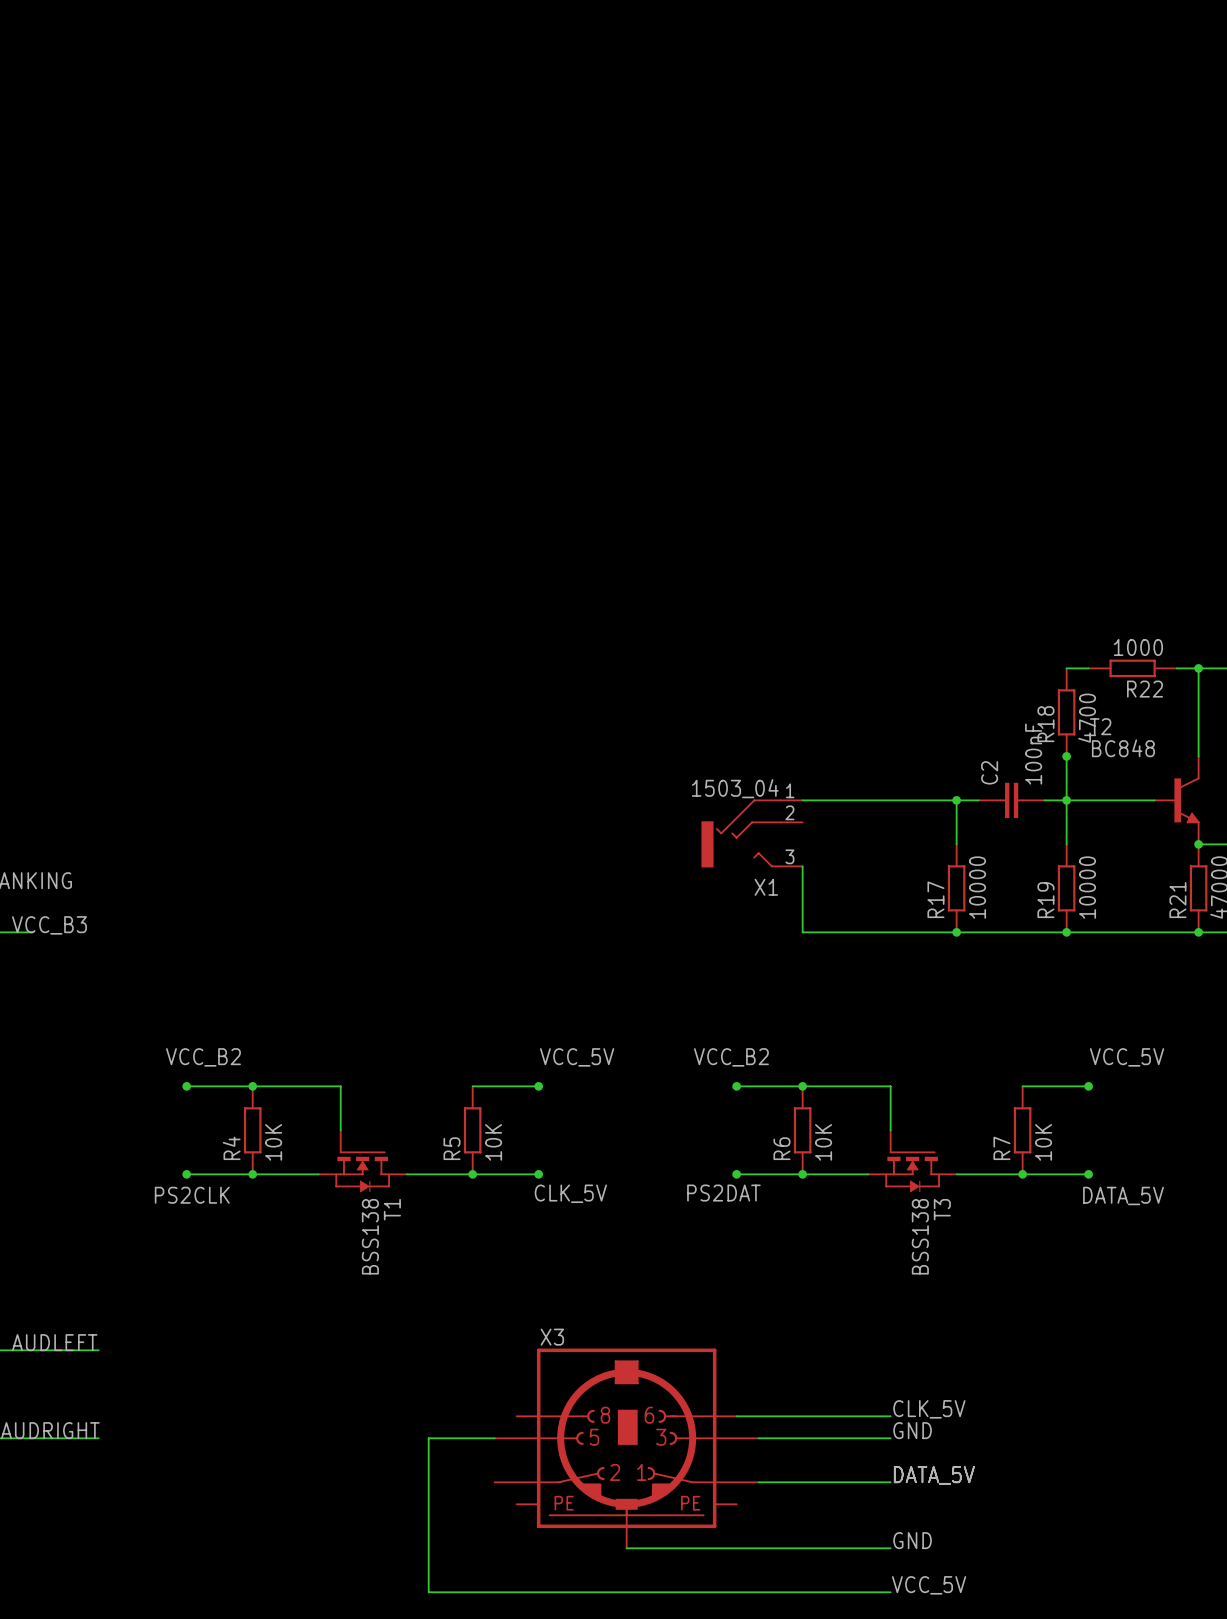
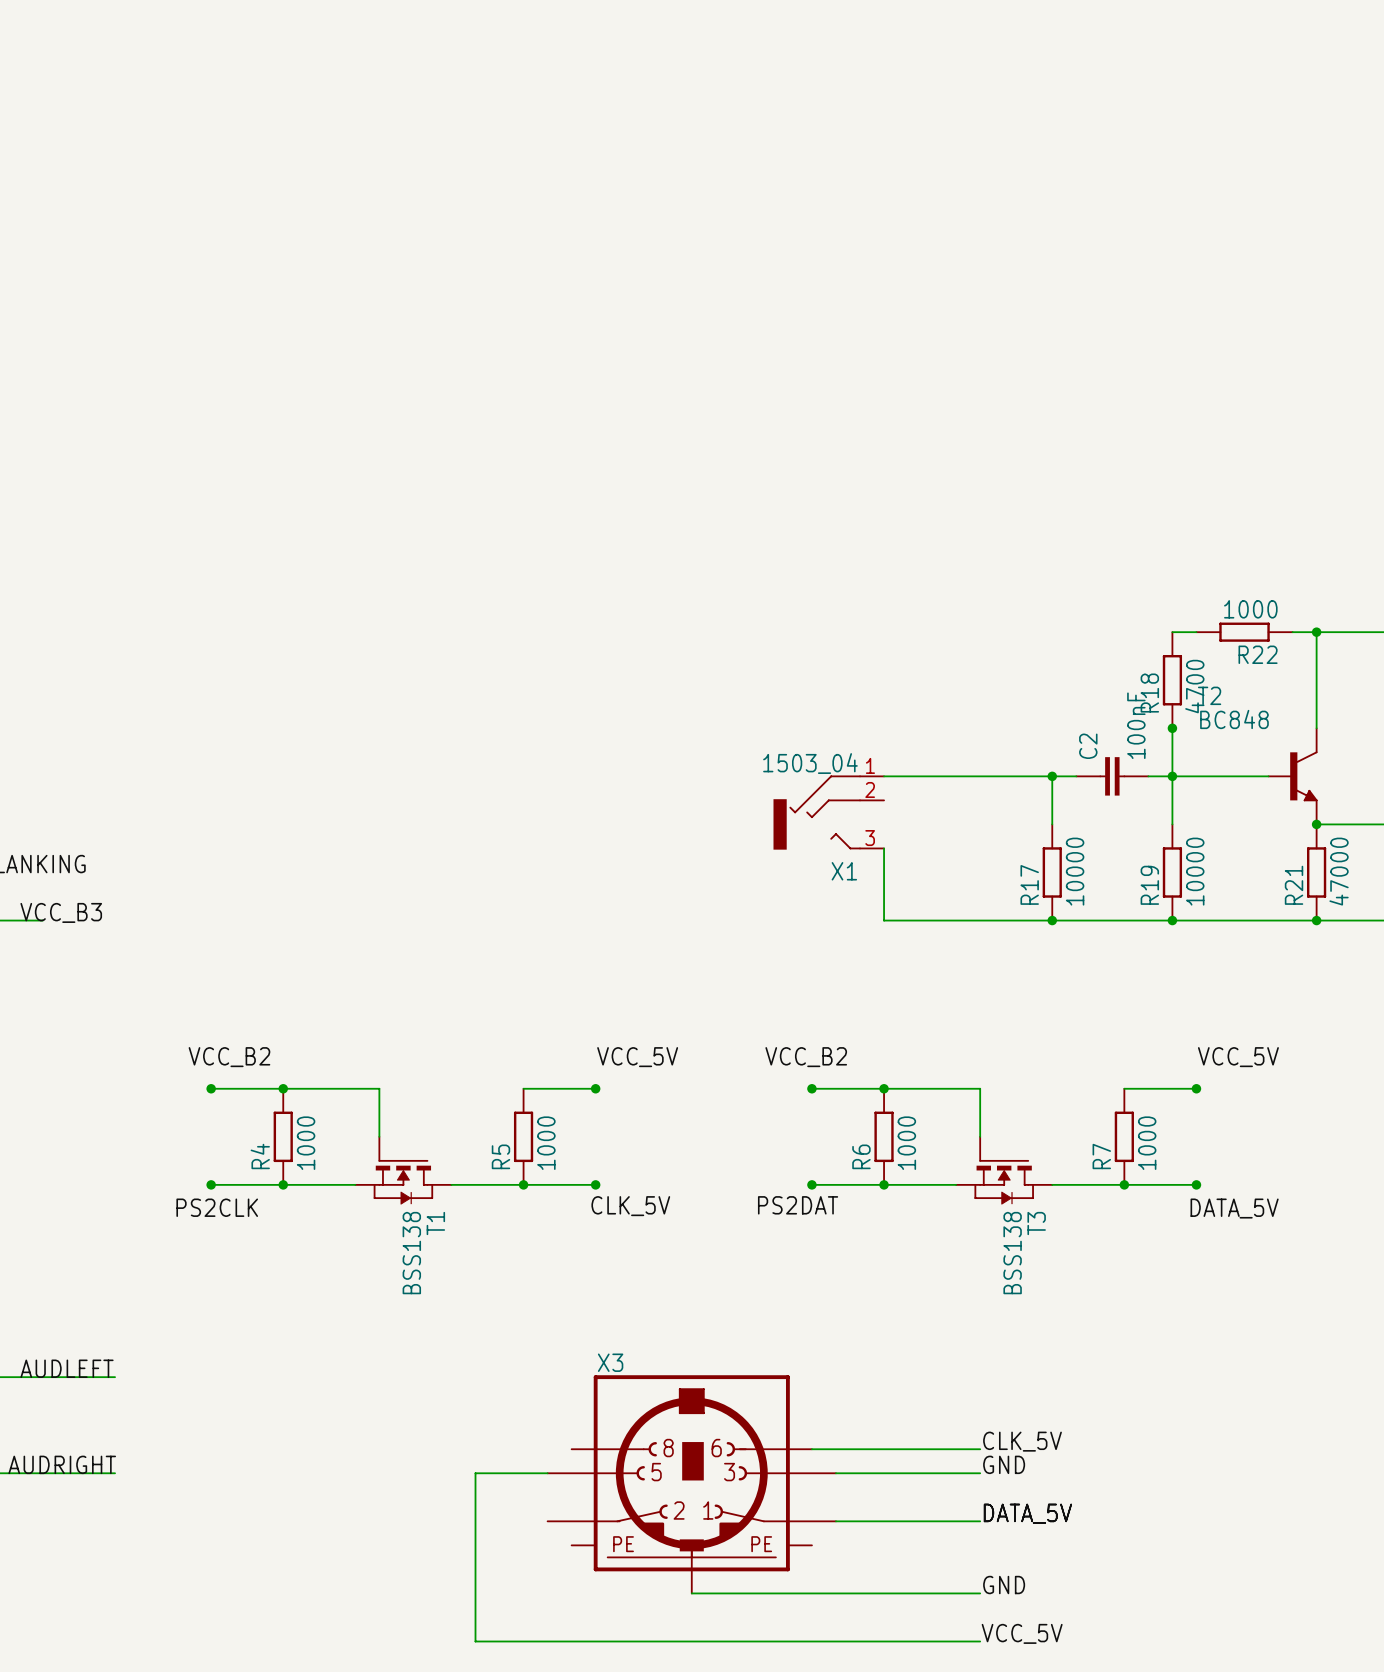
R4 value: 10K (273, 1142) -> 1000 (306, 1143)
R5 value: 10K (493, 1142) -> 1000 (546, 1143)
R6 value: 10K (823, 1142) -> 1000 (906, 1143)
R7 value: 10K (1043, 1142) -> 1000 (1147, 1143)

